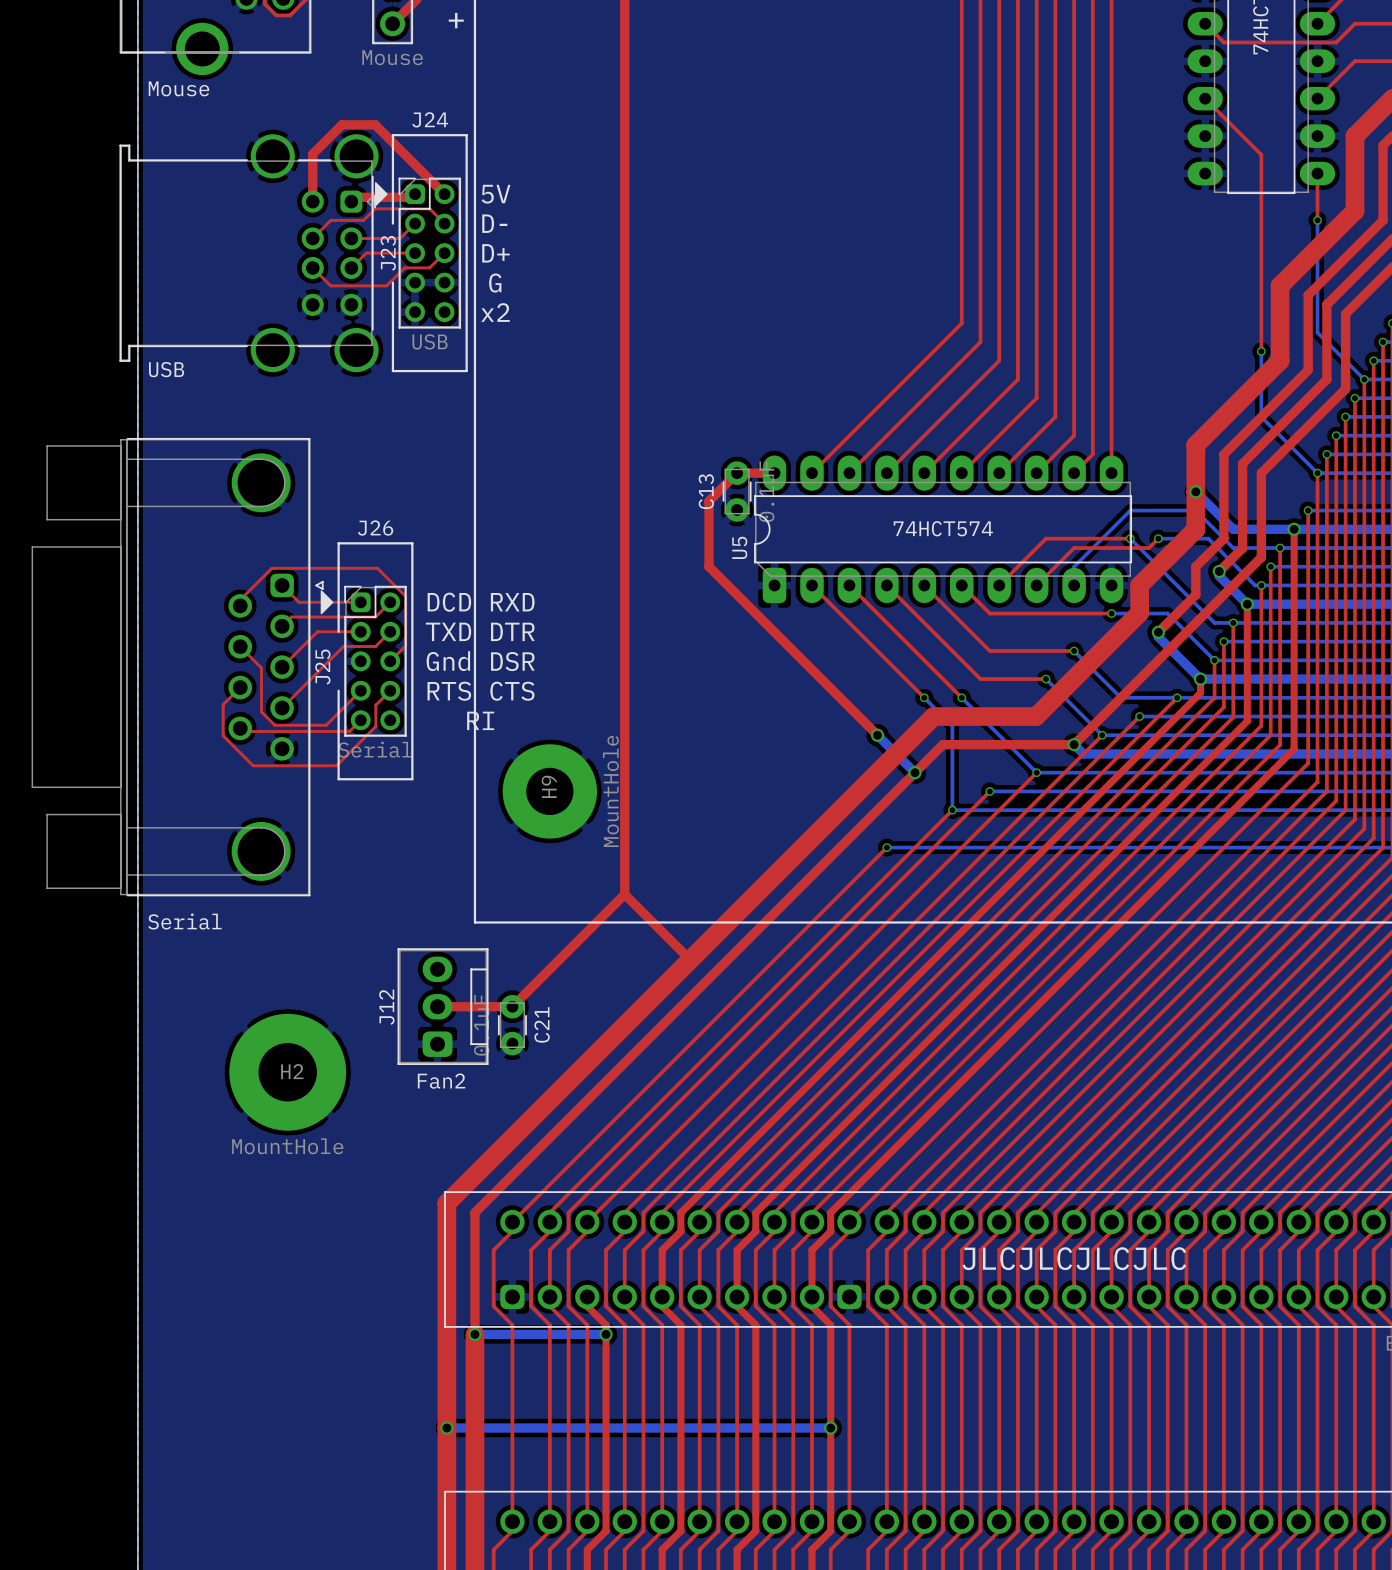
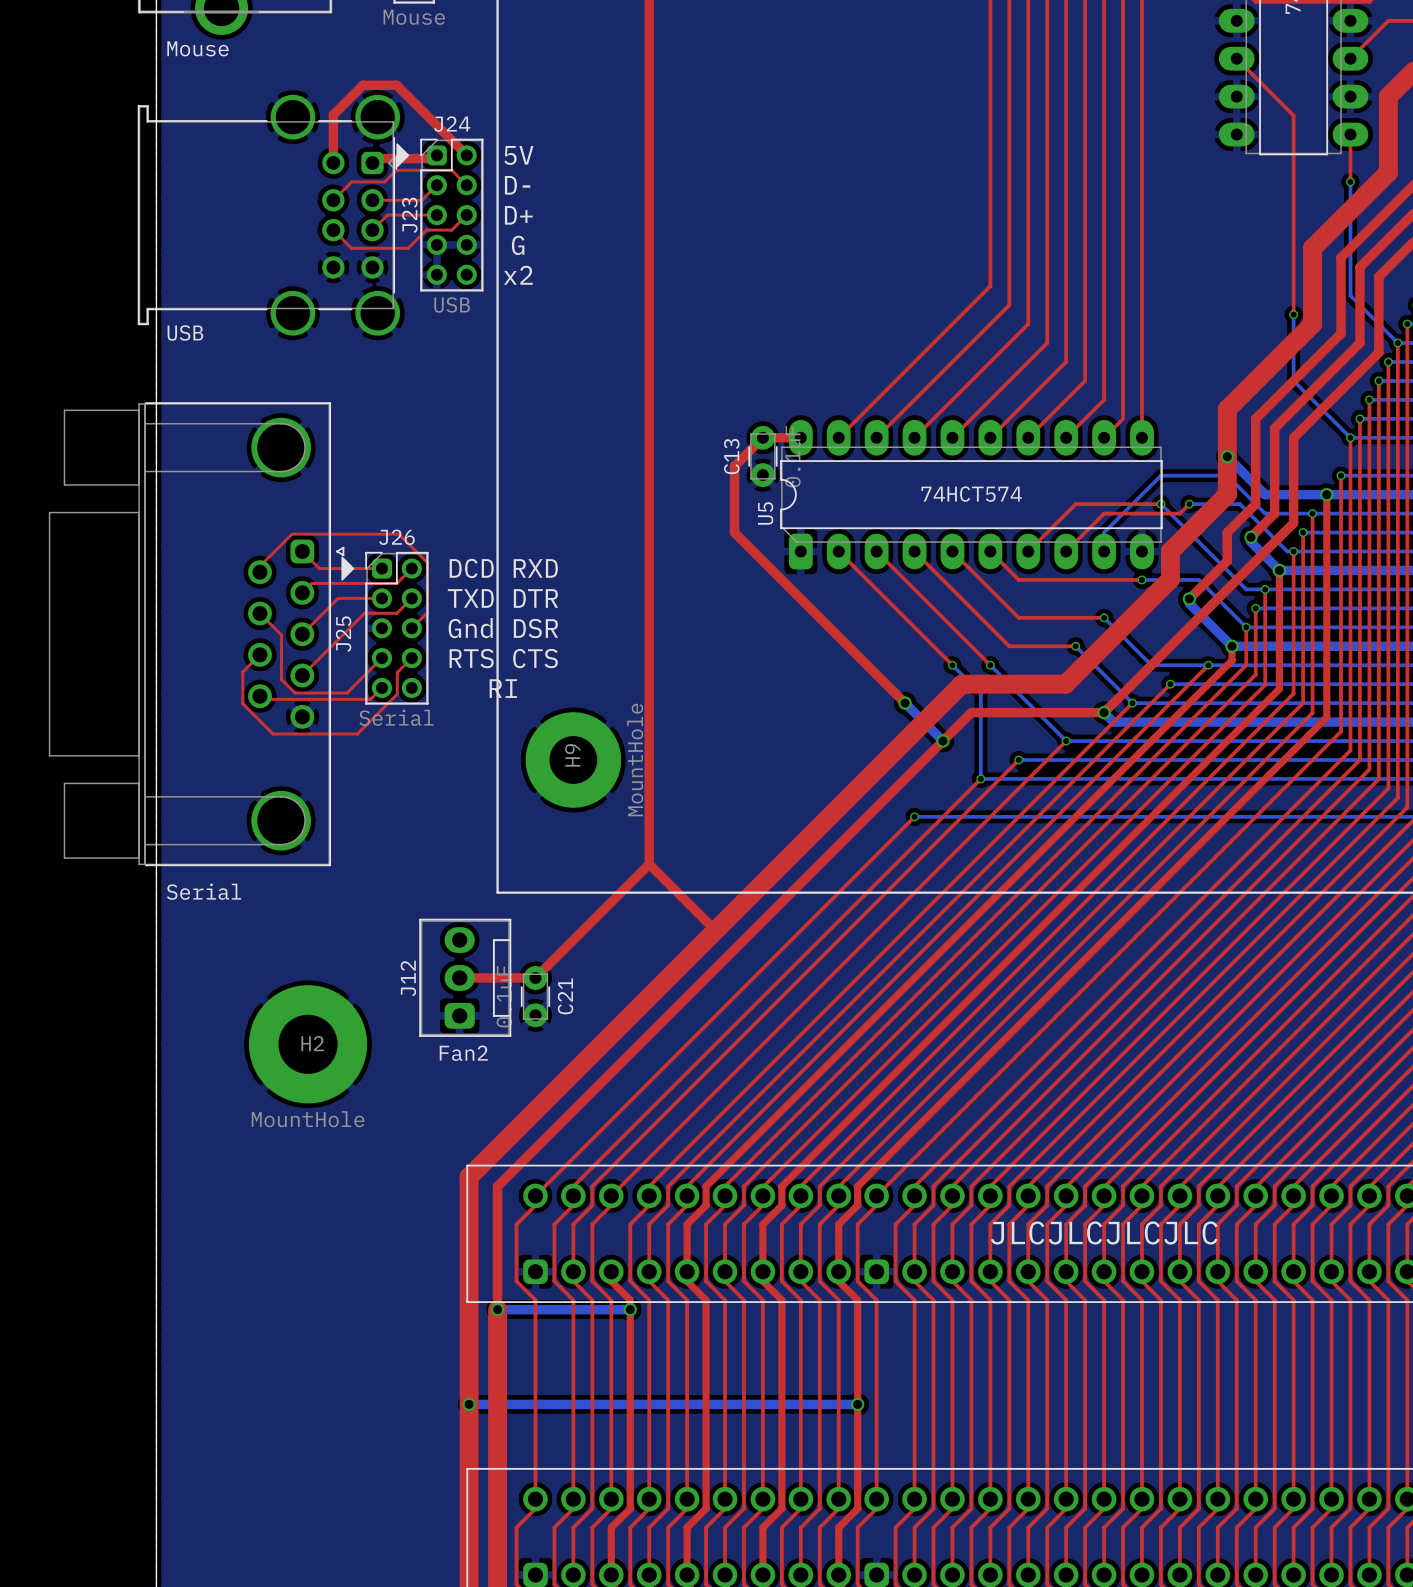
J24 name position: J24 (430, 119) -> J24 (452, 124)
line: (392, 223) (392, 135) (466, 135) (466, 371) (392, 371) (392, 282) -> none
J26 name position: J26 (375, 528) -> J26 (396, 537)
line: (338, 631) (338, 543) (412, 543) (412, 779) (338, 779) (338, 690) -> none

